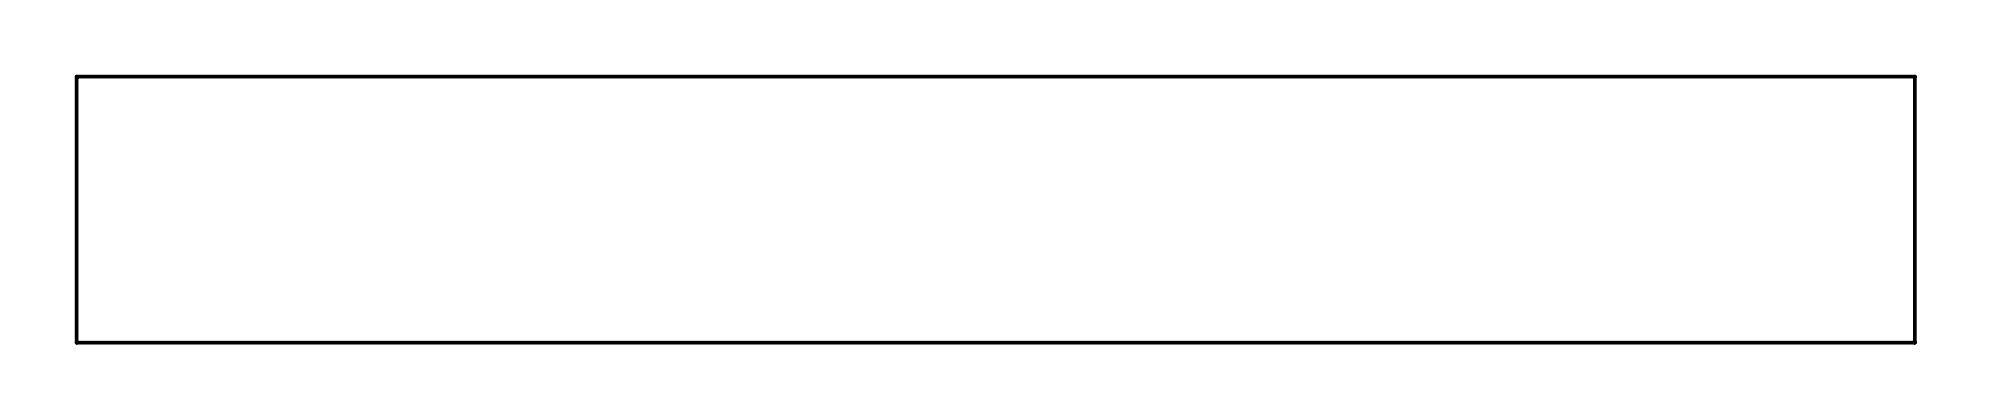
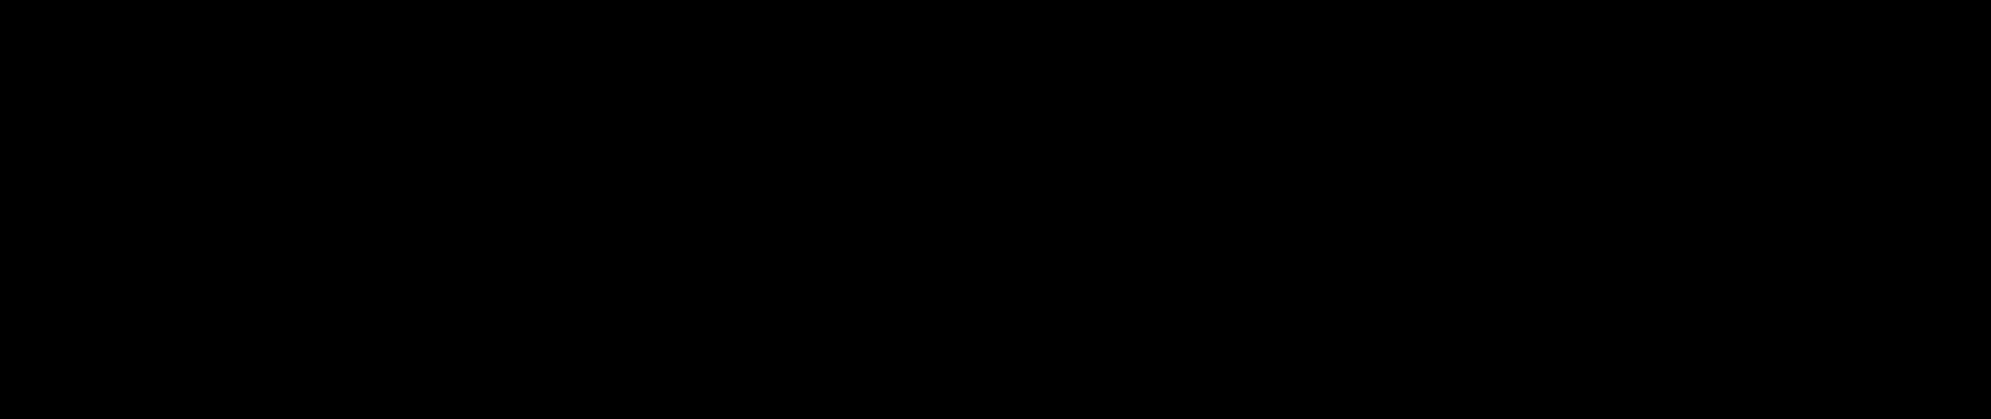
board edge: (1914, 76) (1914, 342) (76, 342) (76, 76) (1914, 76) -> none

